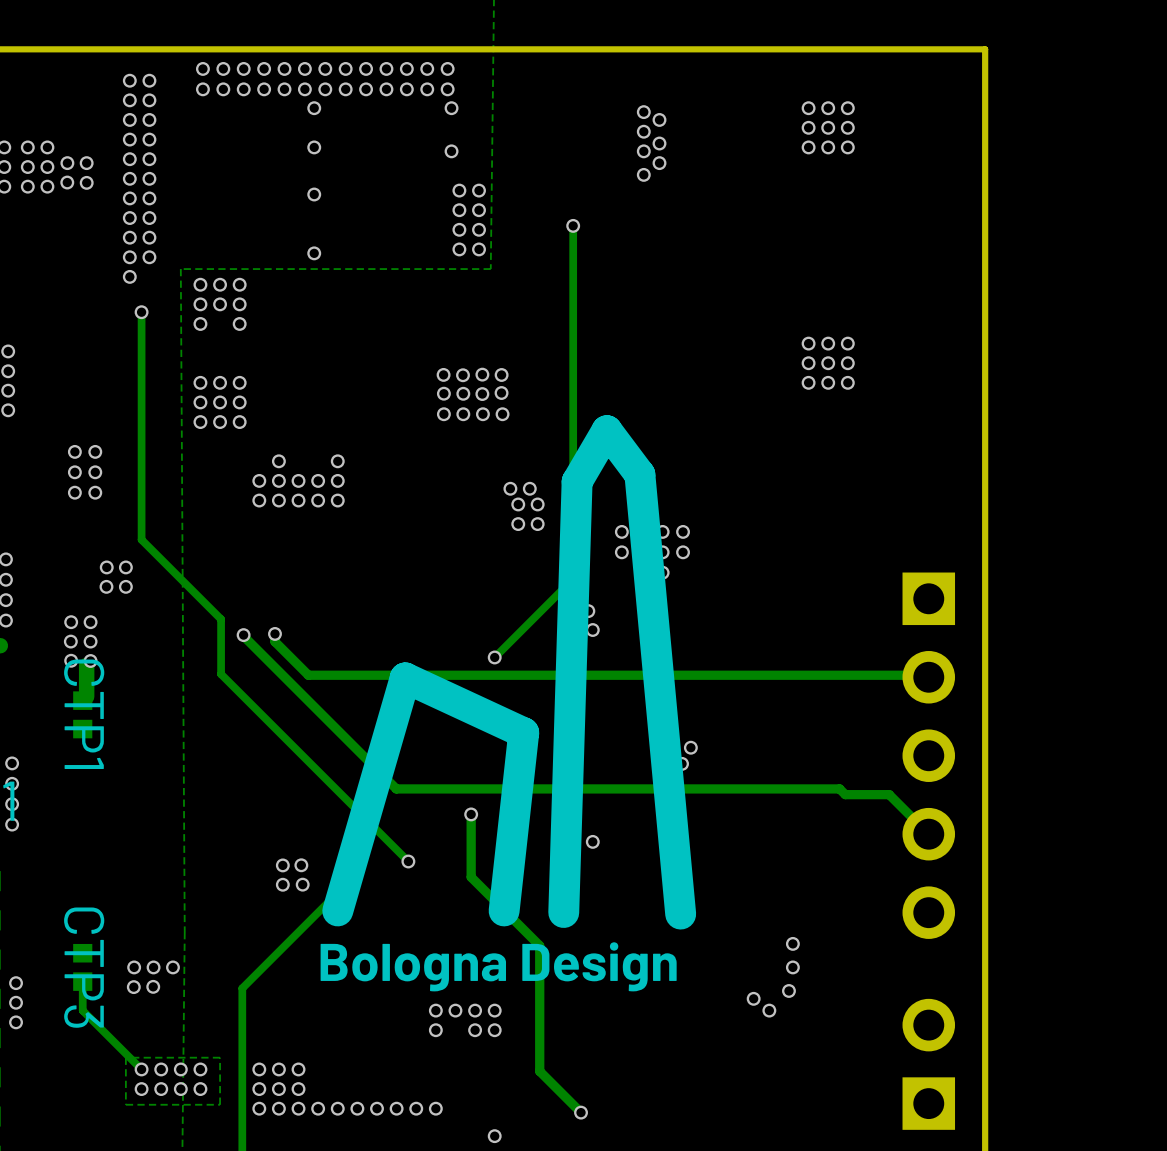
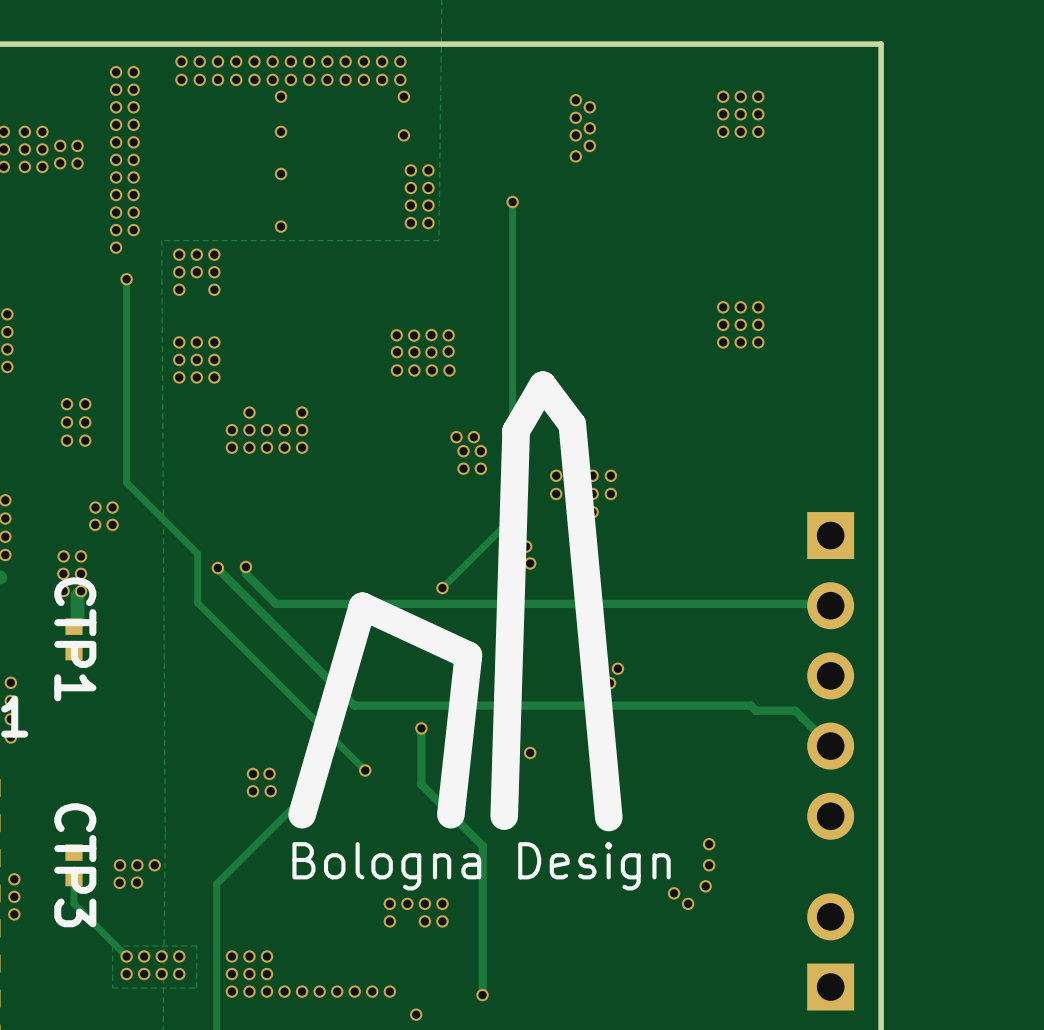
track: (539, 1071) (581, 1112) -> (482, 958) (482, 994)
via: none -> (482, 995)
via: (581, 1112) -> none
via: none -> (416, 1014)
via: (494, 1136) -> none

